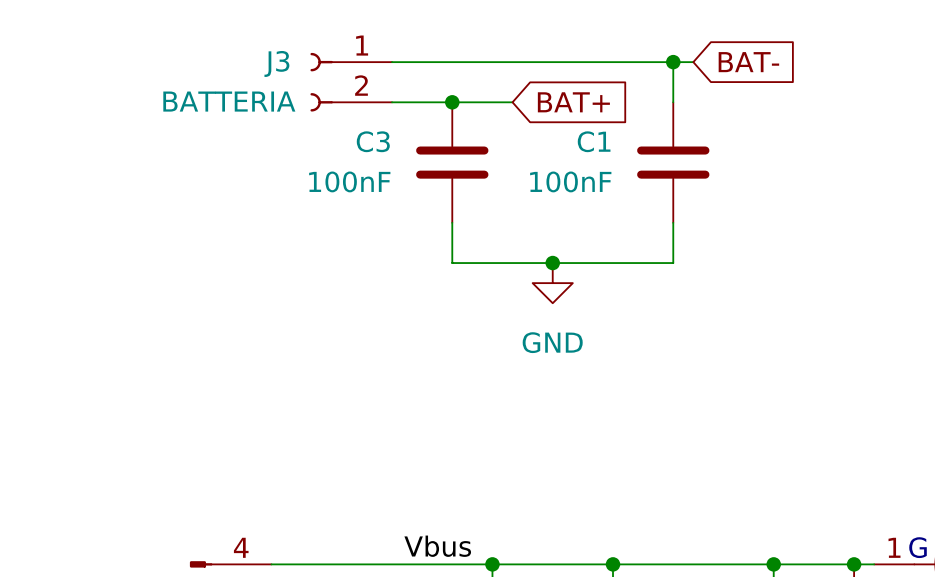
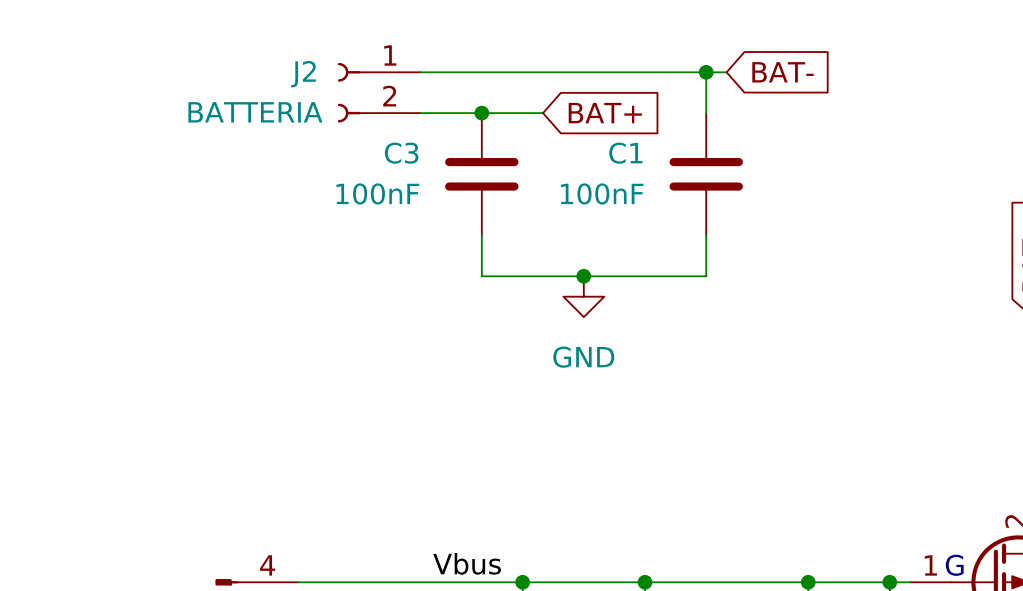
J3 name: J3 (276, 63) -> J2 (303, 74)

